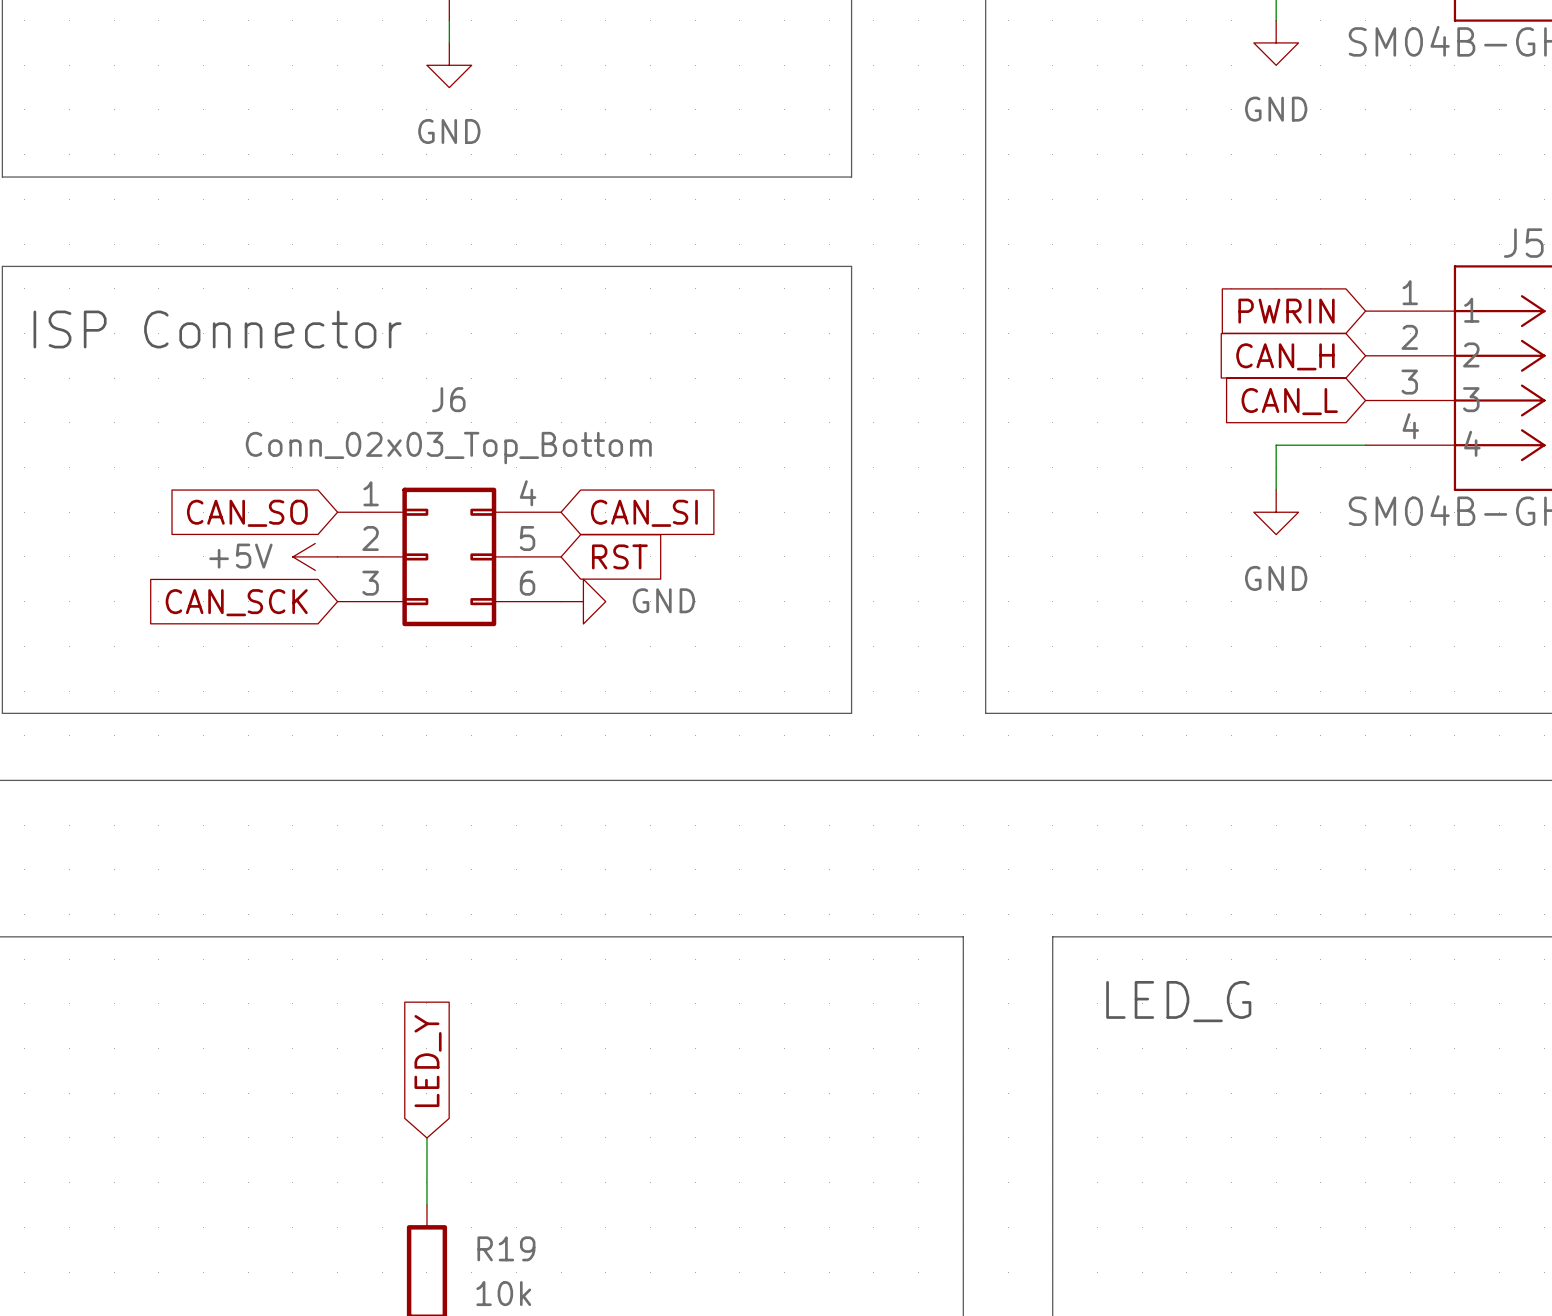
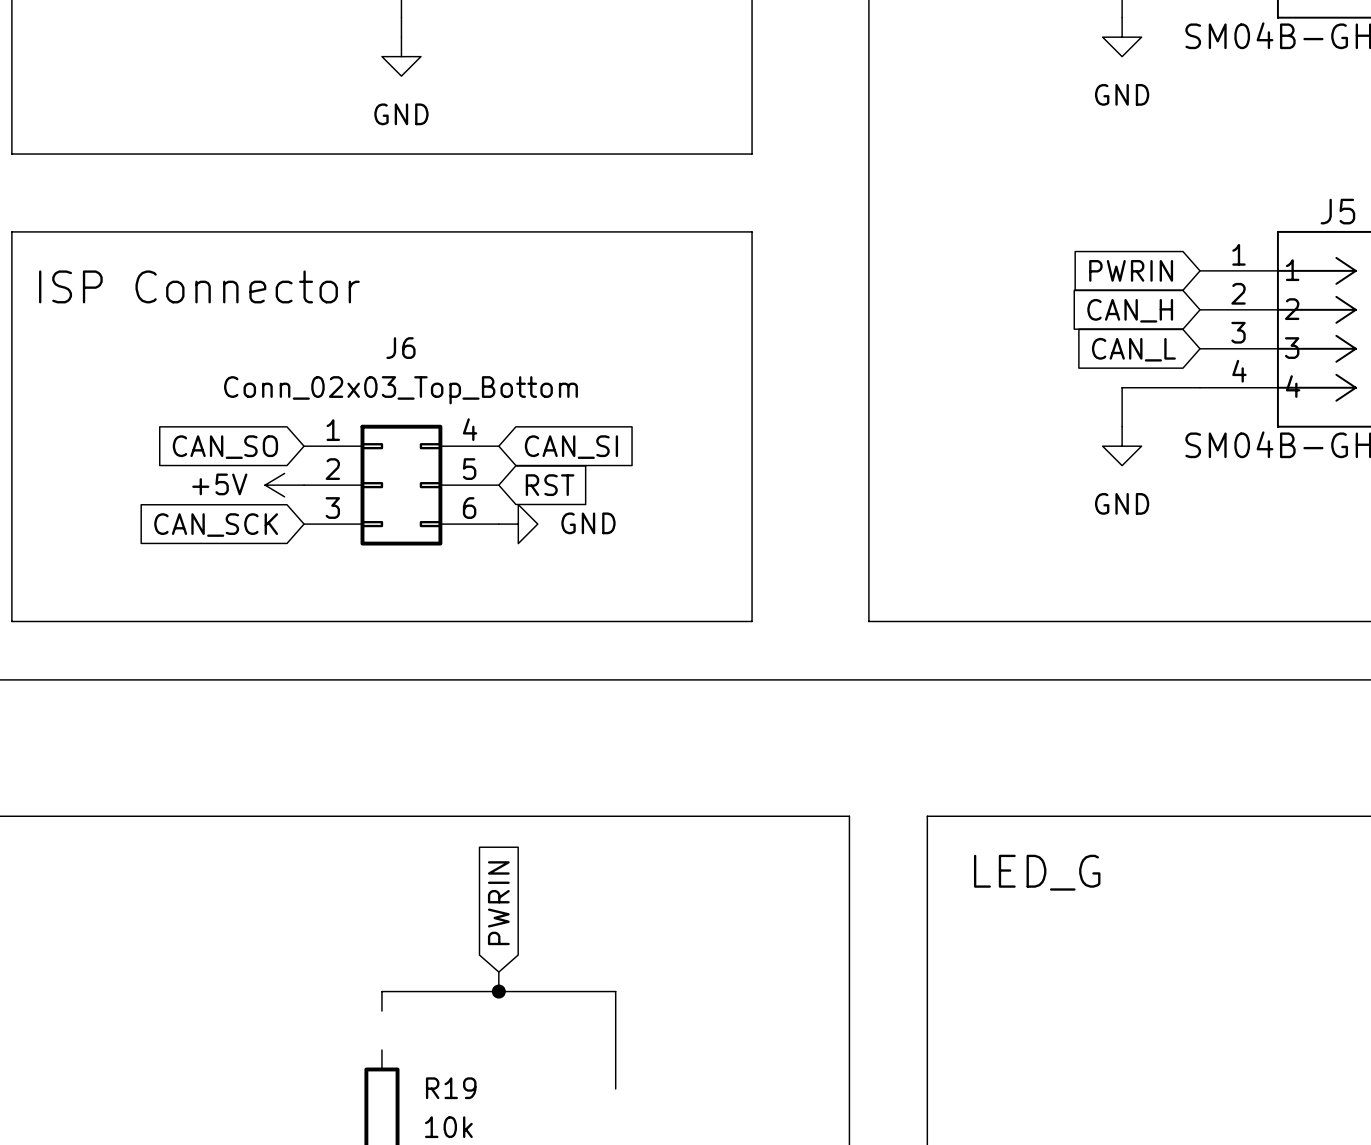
global label: none -> PWRIN (498, 903)
global label: LED_Y (428, 1061) -> none
wire: none -> (498, 972) (498, 991)
wire: none -> (381, 991) (615, 991) (615, 1088)
junction: none -> (498, 991)
wire: (426, 1160) (426, 1205) -> none

